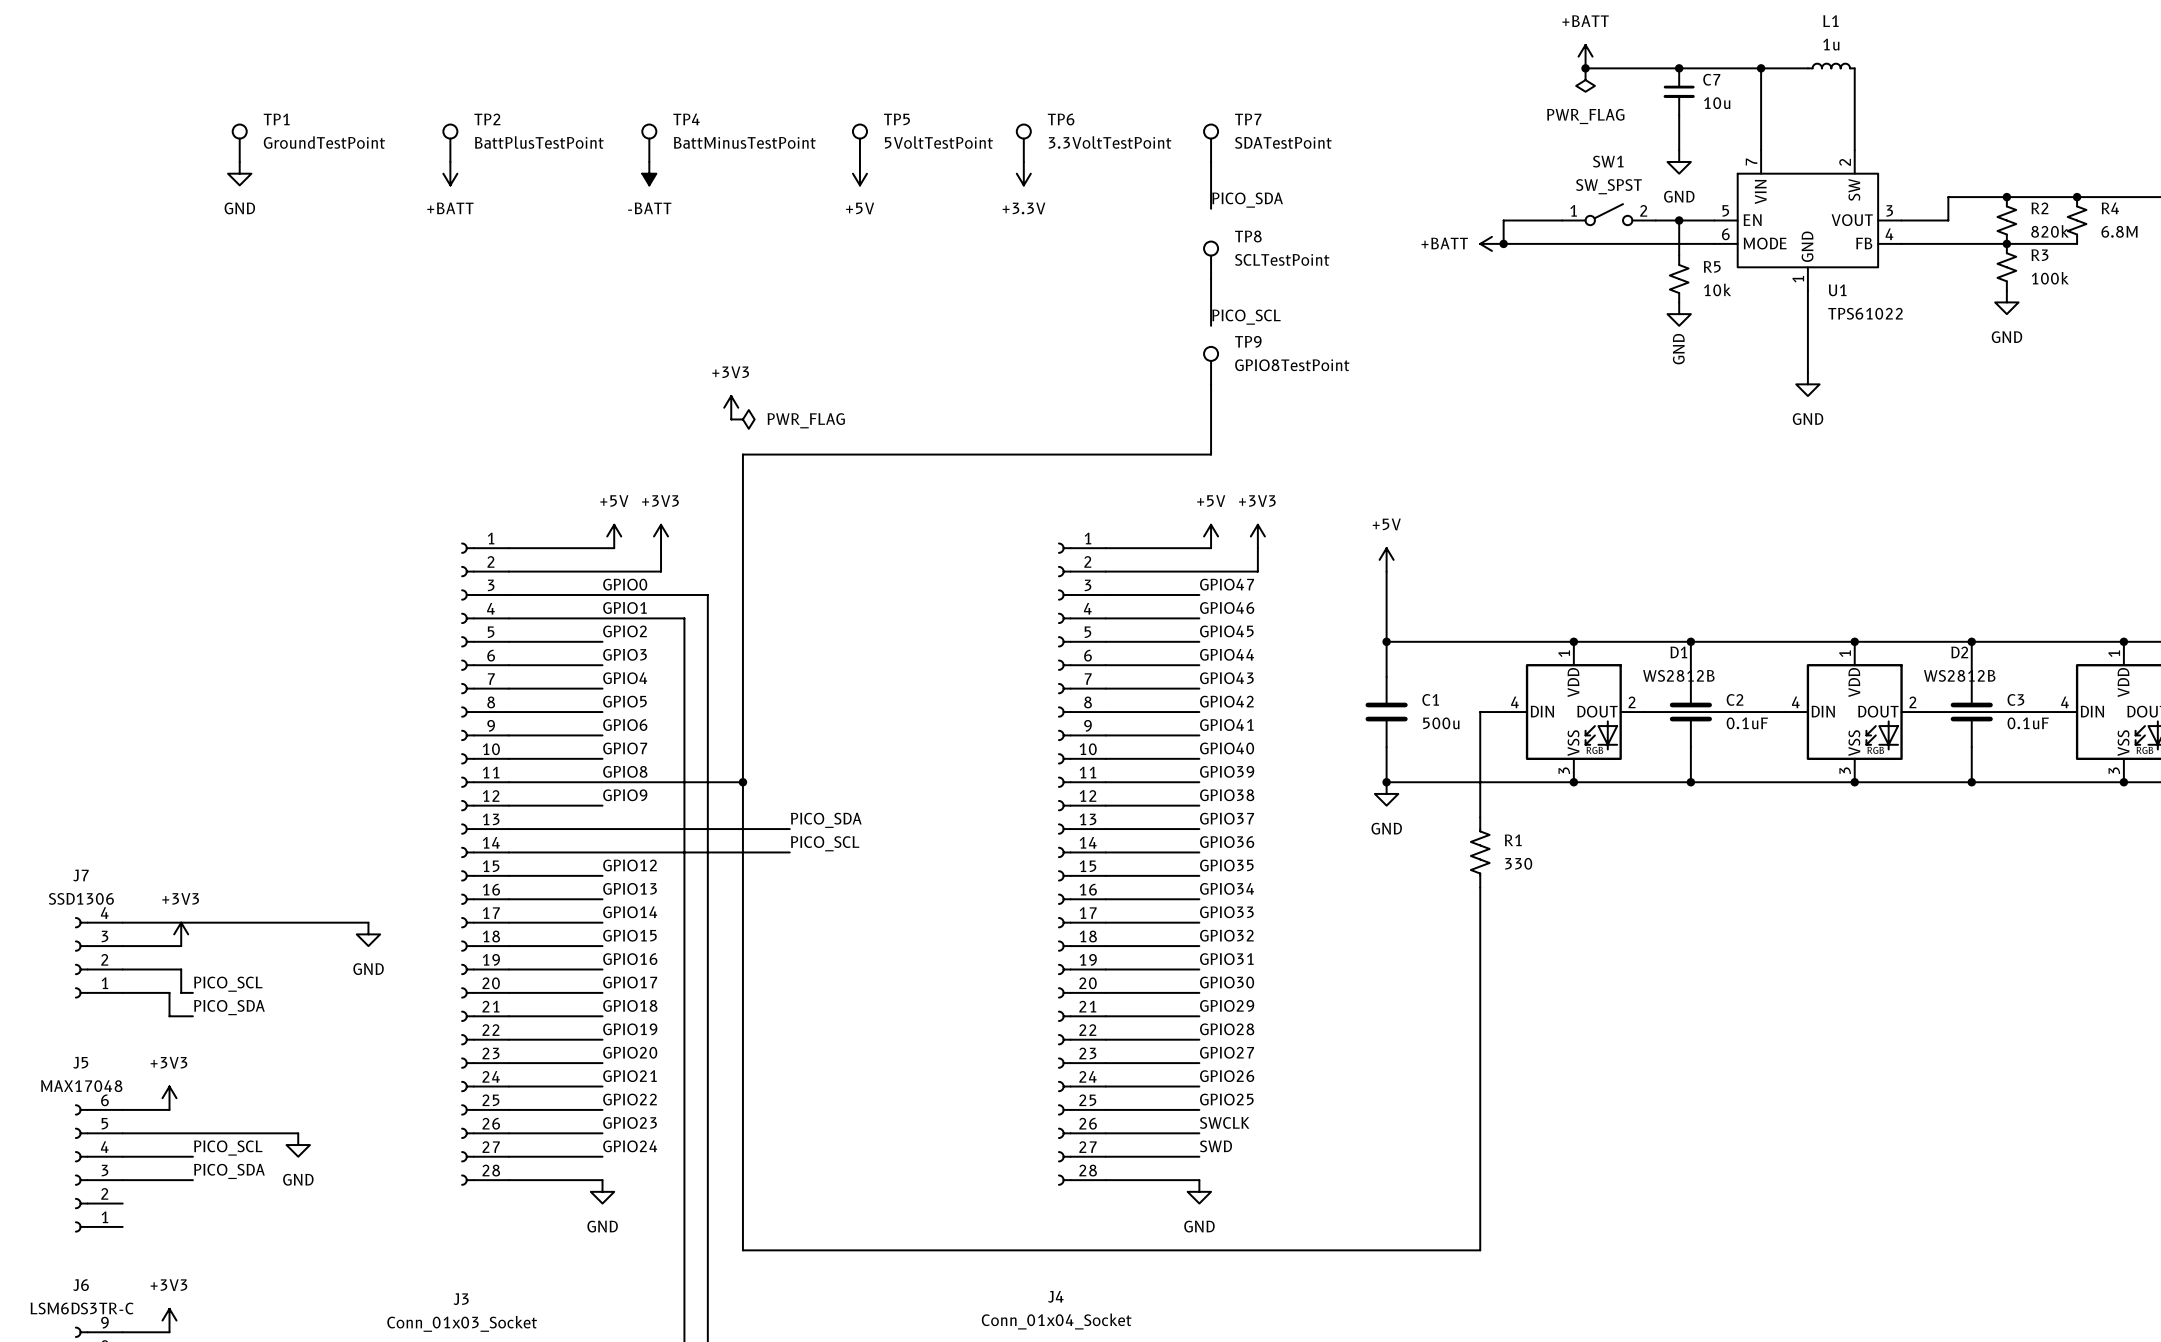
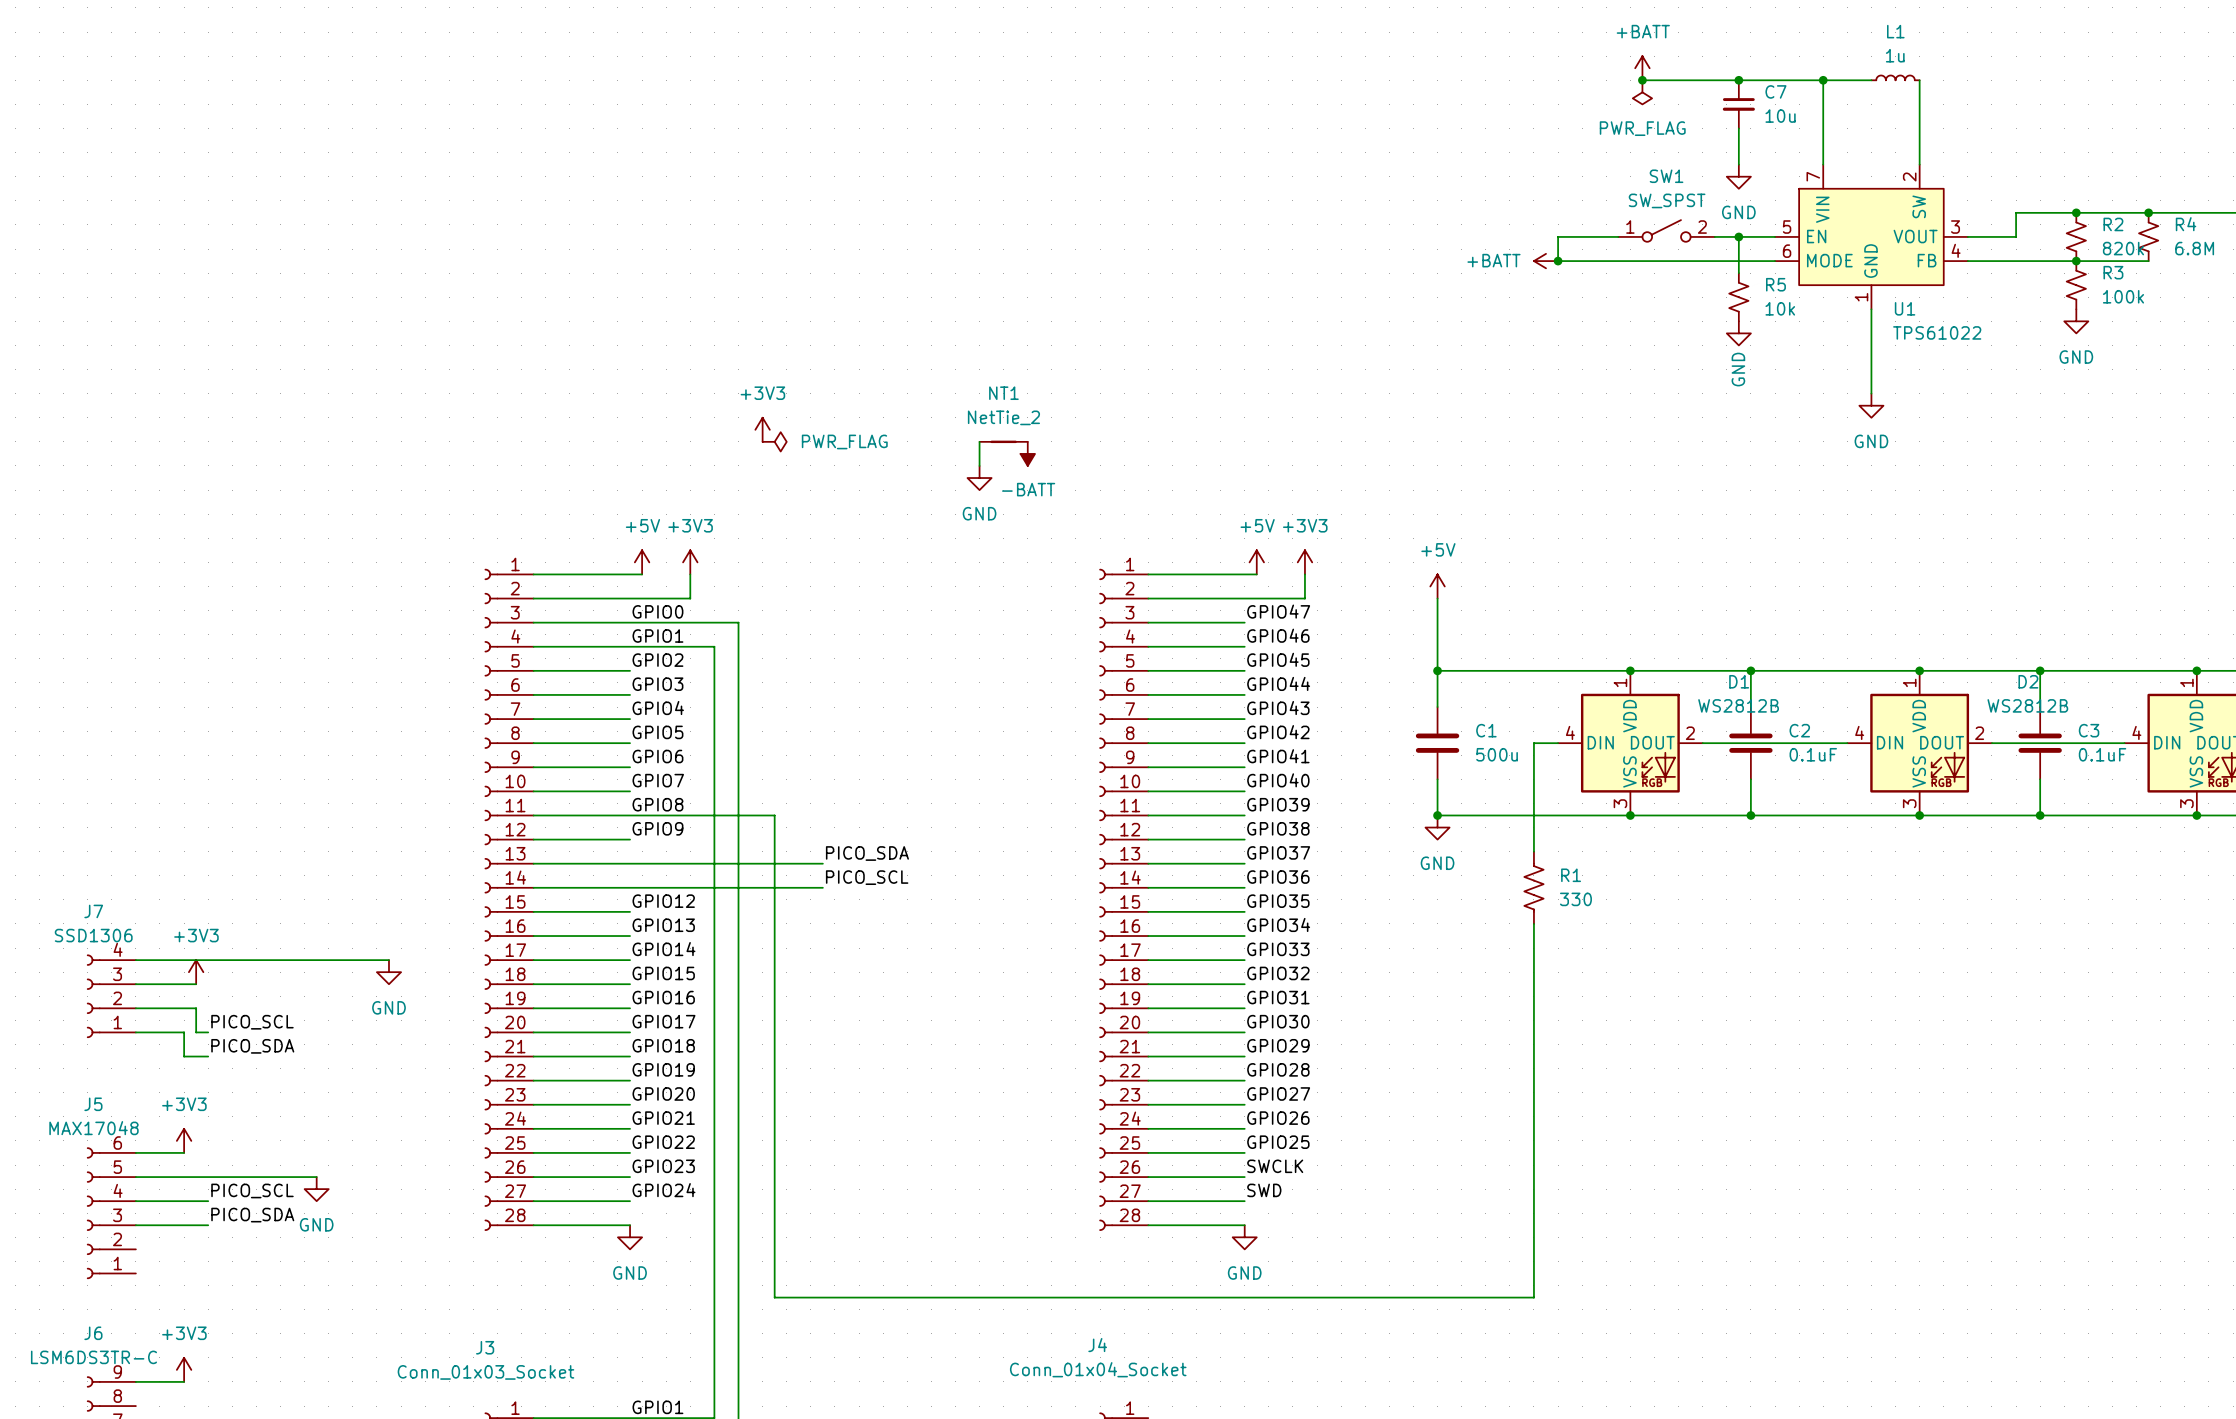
TP1: GroundTestPoint (239, 143) -> none
TP2: BattPlusTestPoint (450, 143) -> none
TP4: BattMinusTestPoint (649, 143) -> none
TP5: 5VoltTestPoint (859, 143) -> none
TP6: 3.3VoltTestPoint (1023, 143) -> none
TP7: SDATestPoint (1211, 143) -> none
wire: (1211, 161) (1211, 208) -> none
power symbol: GND (239, 173) -> none
power symbol: +BATT (450, 173) -> none
power symbol: -BATT (649, 173) -> none
power symbol: +5V (859, 173) -> none
power symbol: +3.3V (1023, 173) -> none
label: PICO_SDA (1247, 200) -> none
TP8: SCLTestPoint (1211, 260) -> none
wire: (1211, 279) (1211, 325) -> none
label: PICO_SCL (1246, 317) -> none
TP9: GPIO8TestPoint (1211, 365) -> none
wire: (1211, 384) (1211, 454) (742, 454) (742, 782) -> none
wire: none -> (979, 441) (979, 465)
NT1: none -> NetTie_2 (1003, 441)
power symbol: none -> -BATT (1027, 453)
power symbol: none -> GND (979, 478)
junction: (742, 782) -> none

